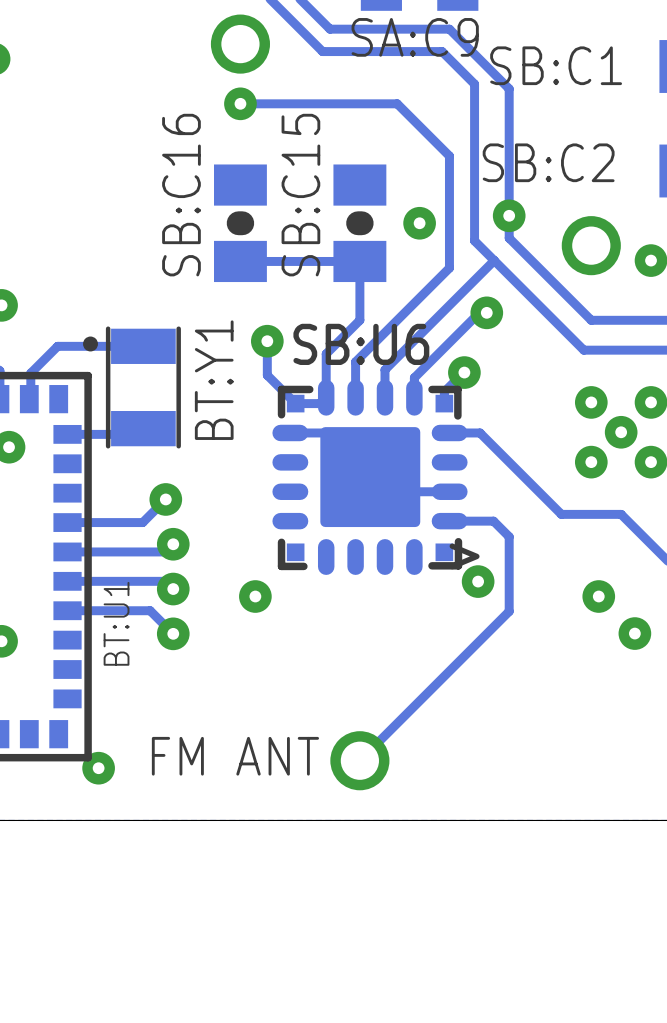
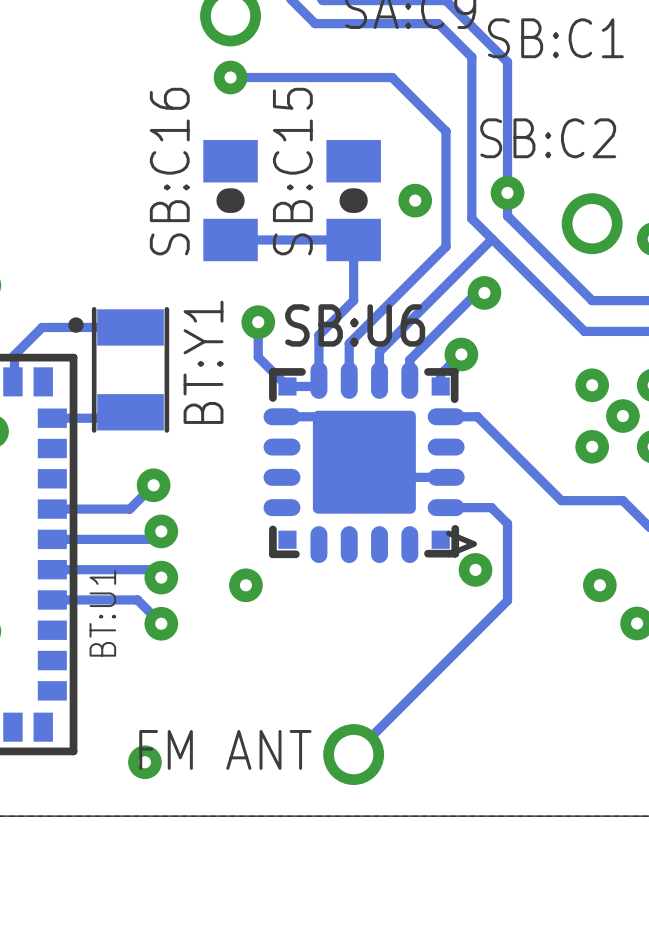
via position: (98, 768) -> (144, 762)

